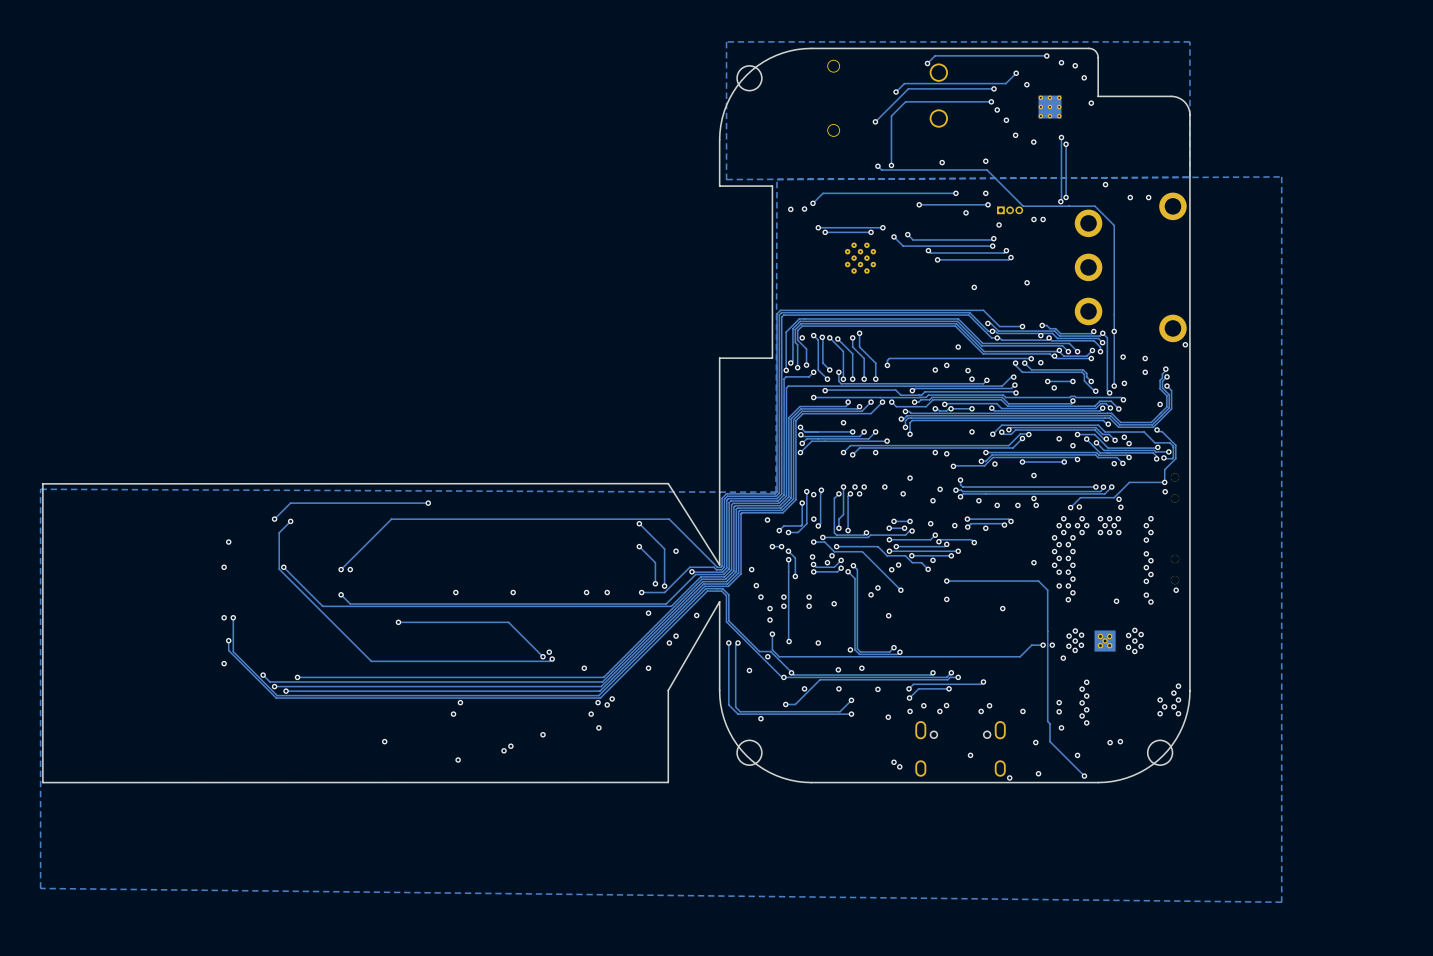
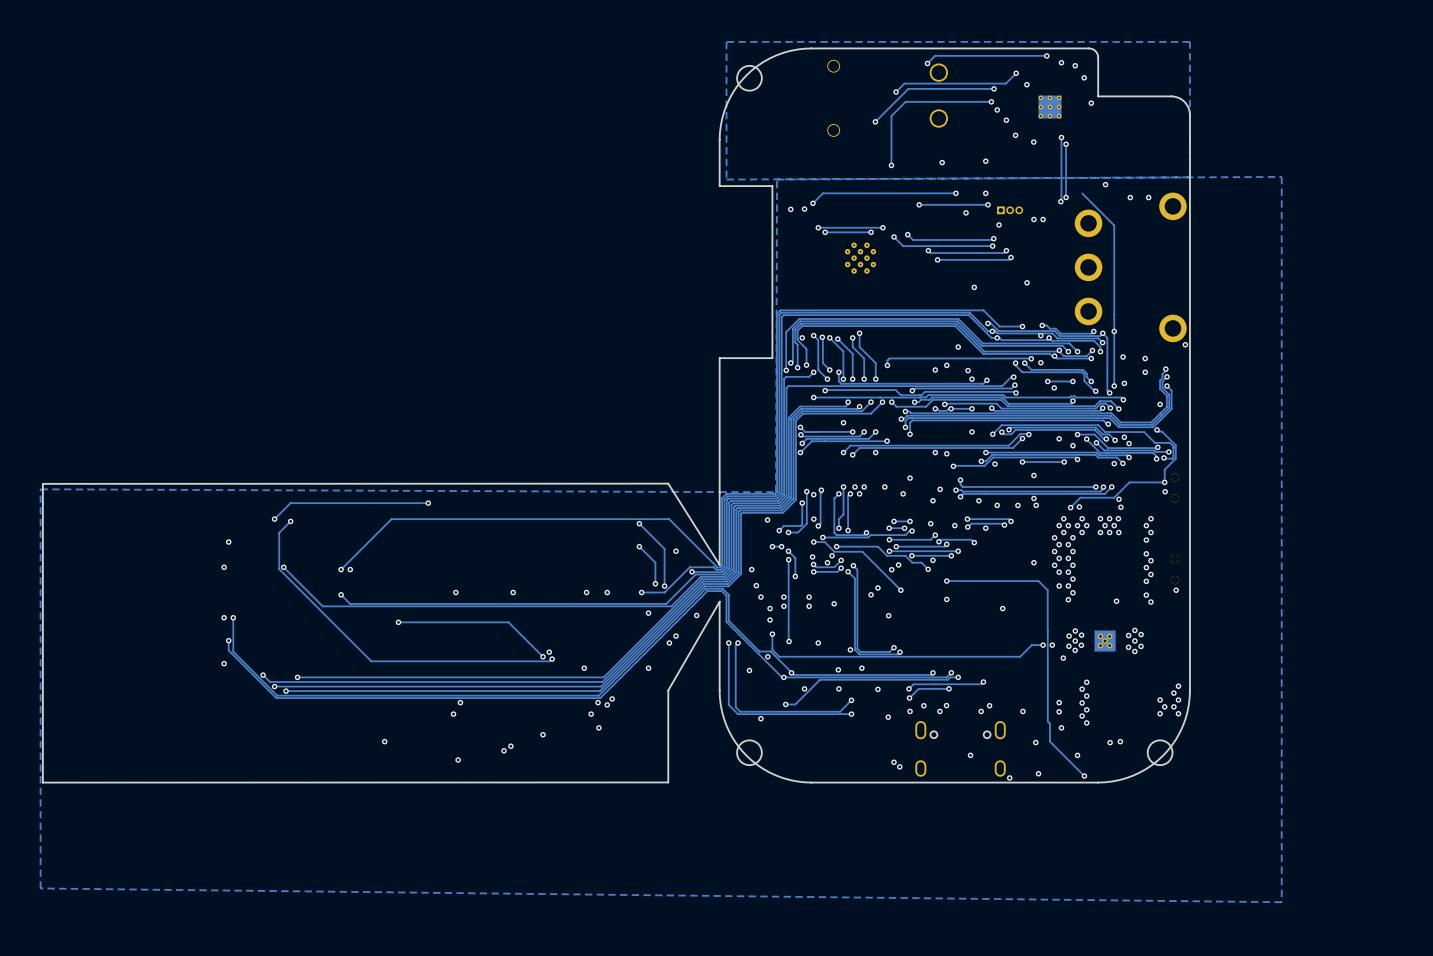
track: (877, 166) (881, 170) (987, 170) (1023, 206) (1094, 206) -> (1082, 193) (1094, 206)
via: (877, 166) -> none

